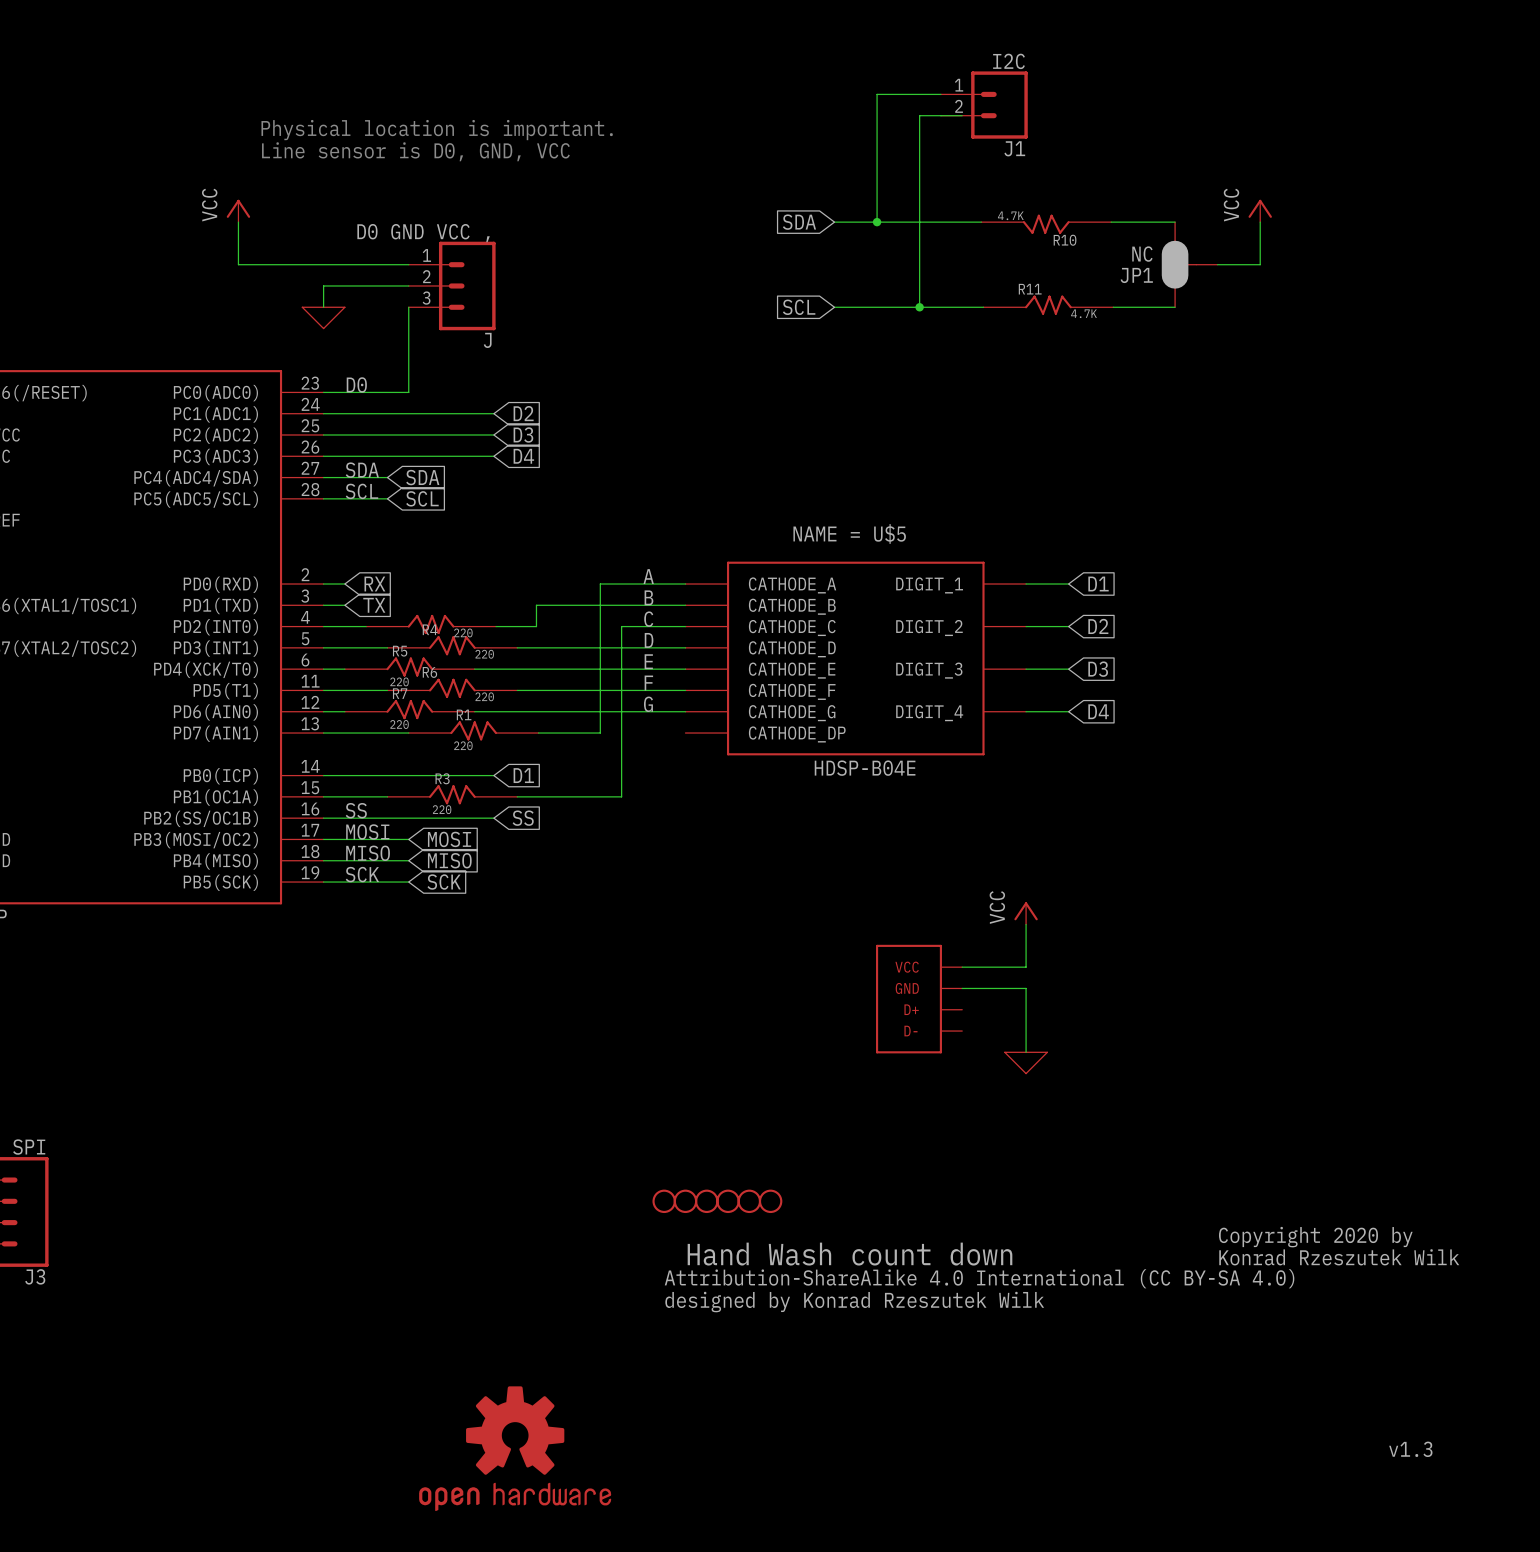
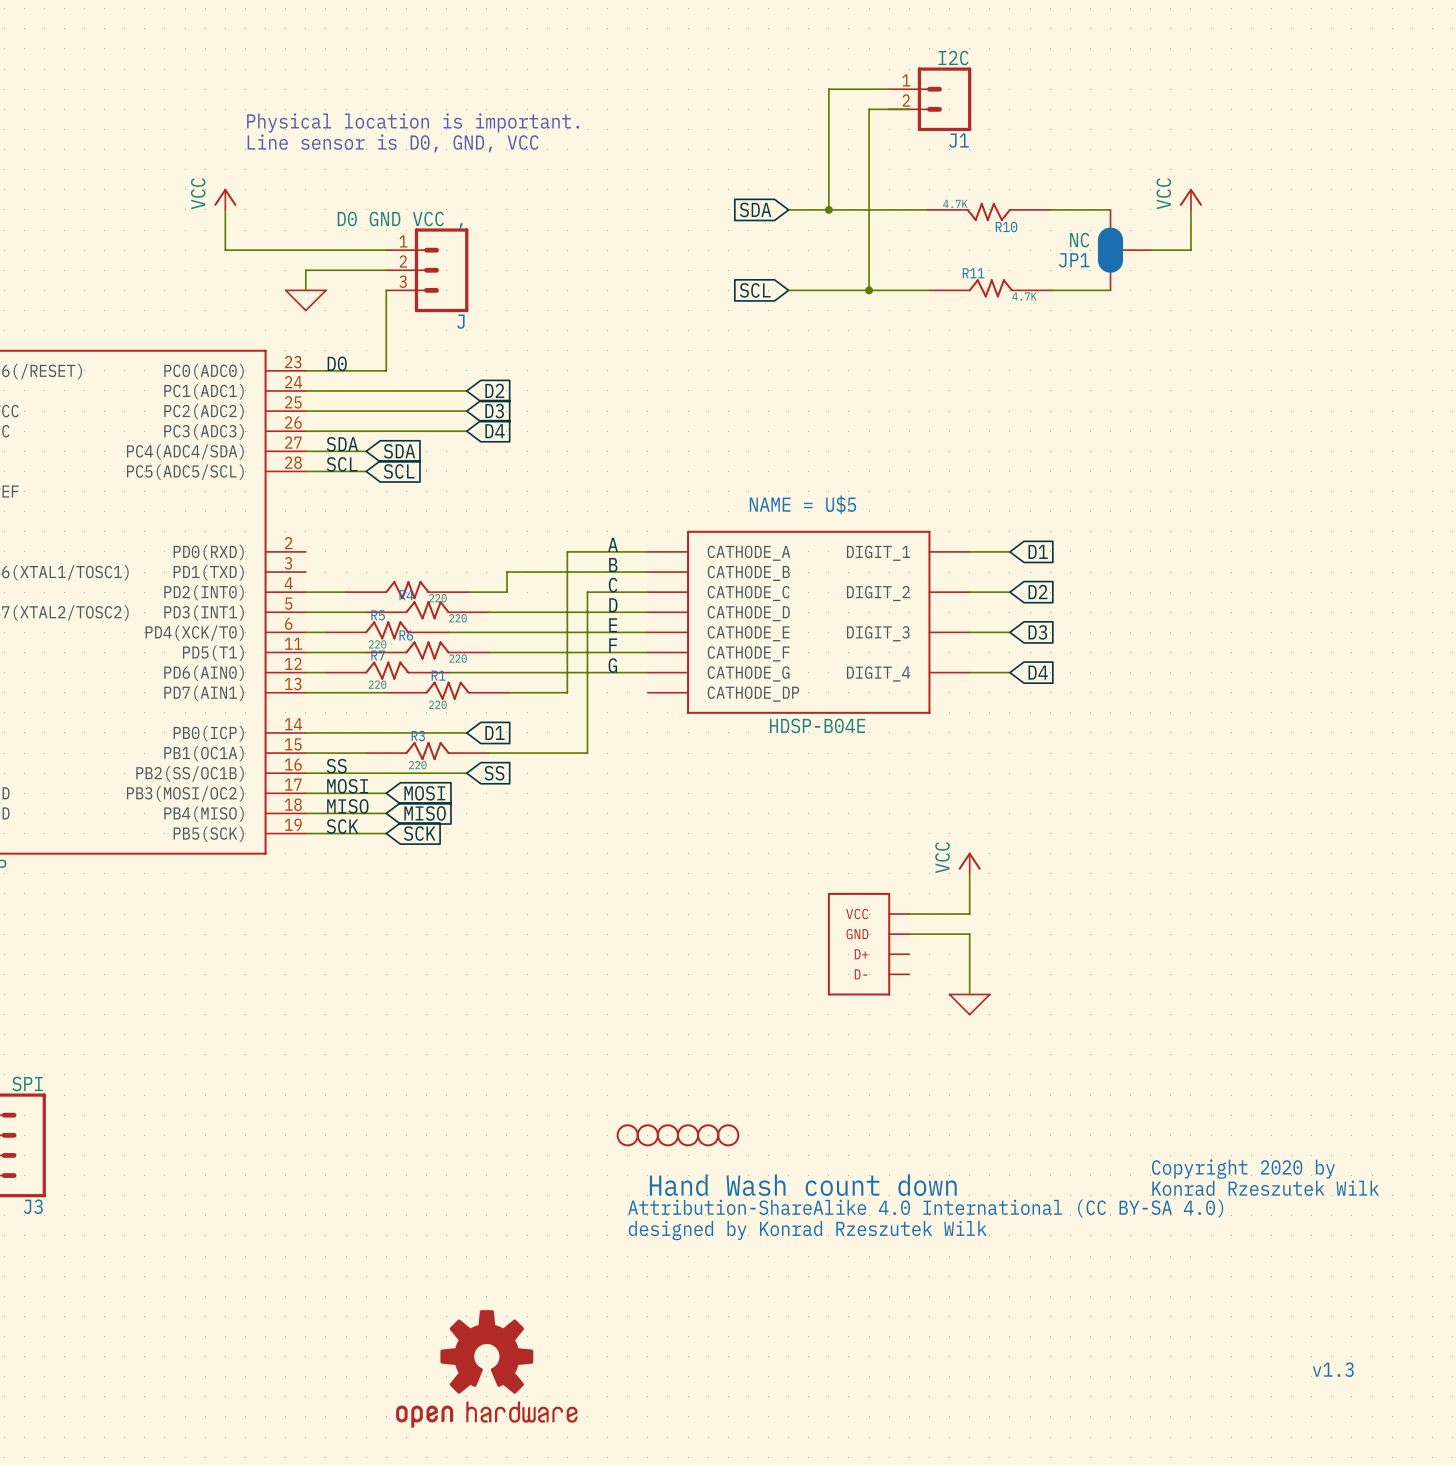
wire: (323, 584) (344, 584) -> none
global label: RX (374, 584) -> none
wire: (323, 605) (344, 605) -> none
global label: TX (374, 605) -> none

